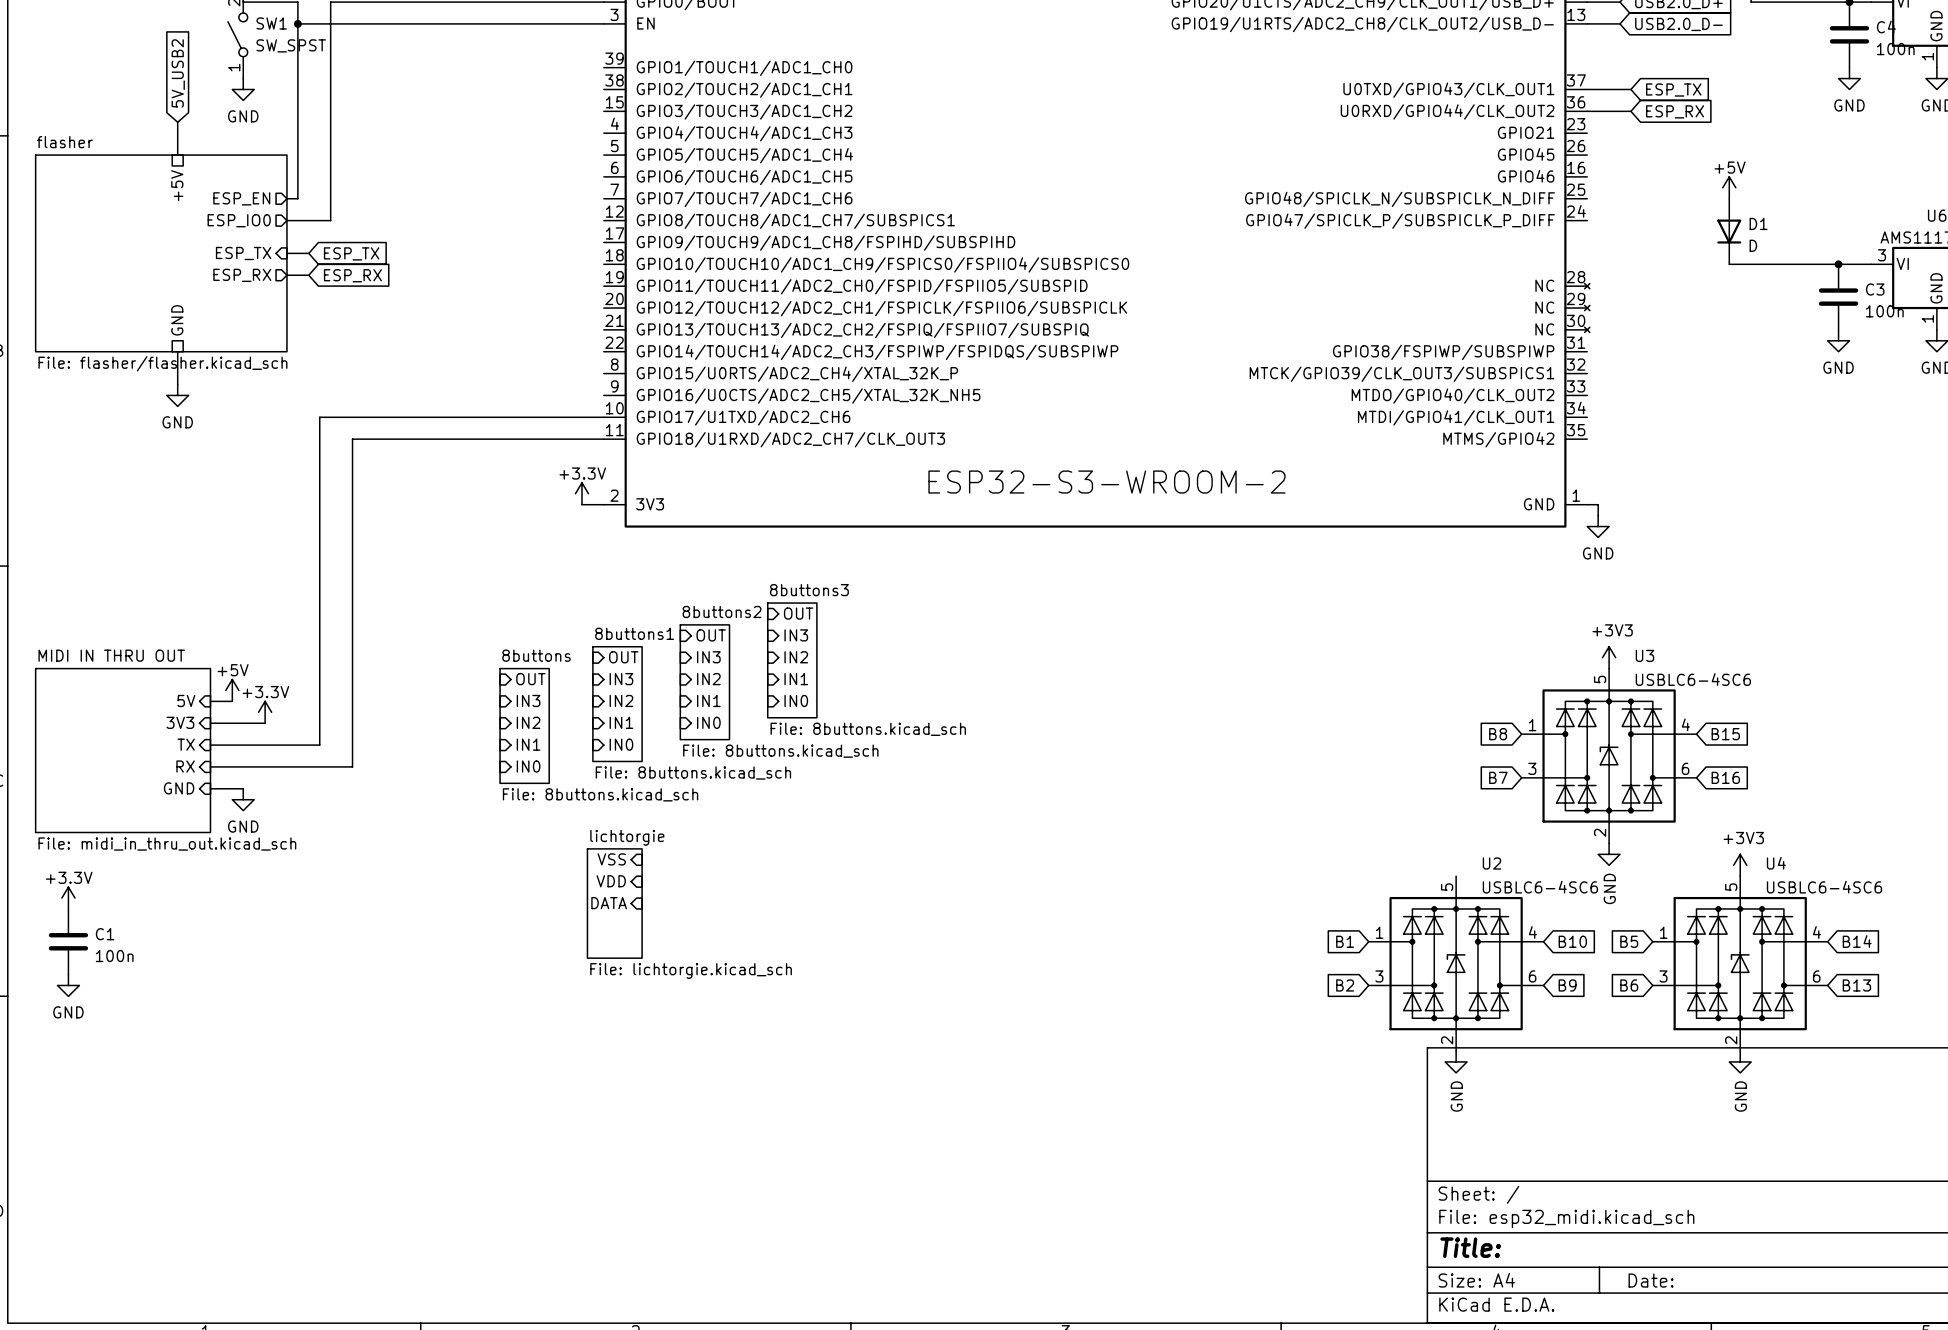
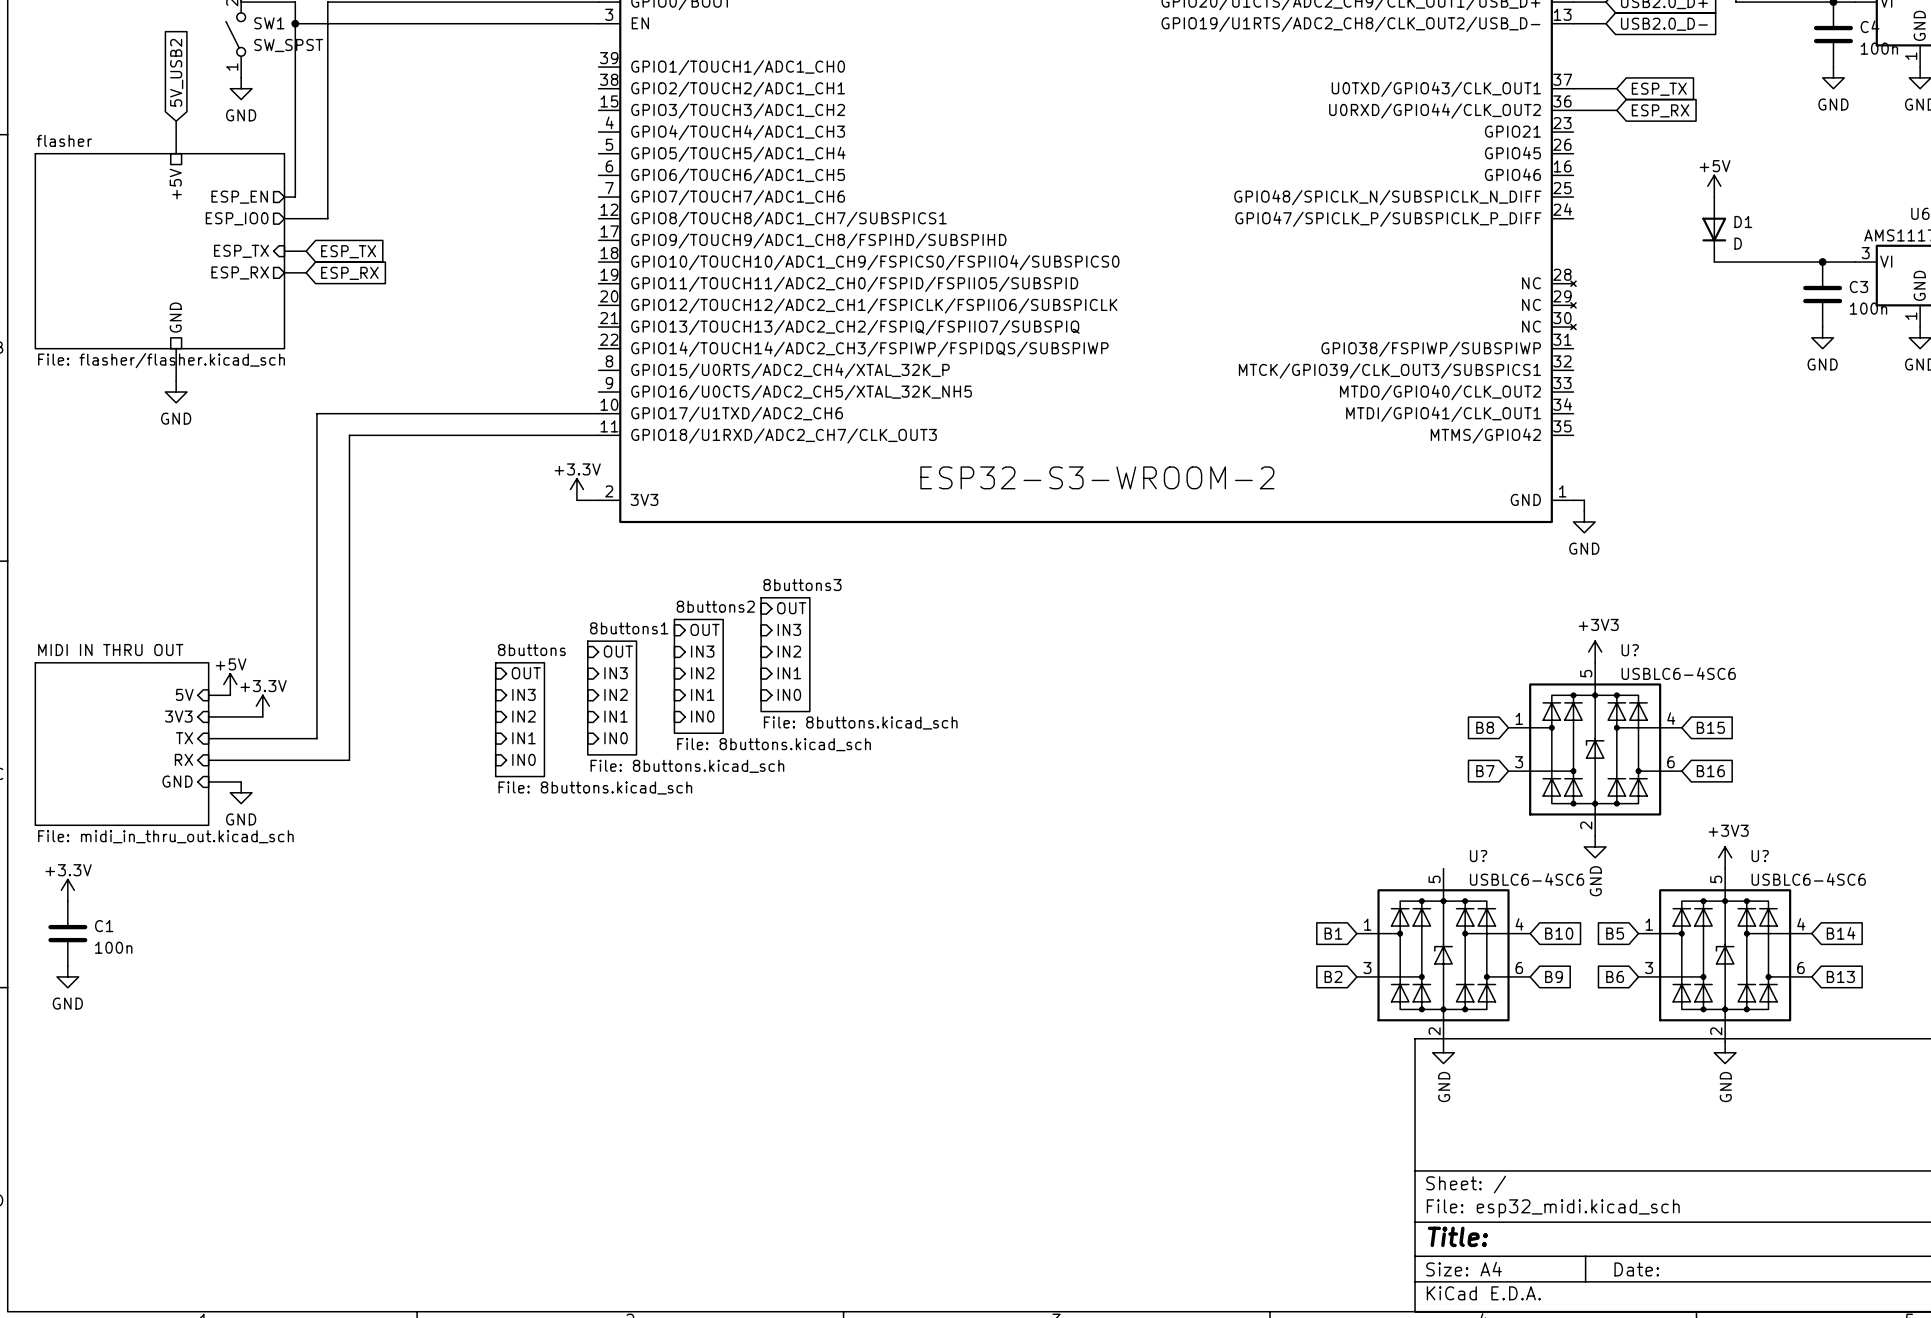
U3 name: U3 (1644, 655) -> U? (1630, 650)
sheet pin: VSS (611, 859) -> none
U2 name: U2 (1491, 863) -> U? (1478, 856)
U4 name: U4 (1776, 863) -> U? (1760, 856)
sheet pin: VDD (611, 881) -> none
sheet pin: DATA (609, 903) -> none
sheet lichtorgie: File: lichtorgie.kicad_sch (614, 903) -> none

